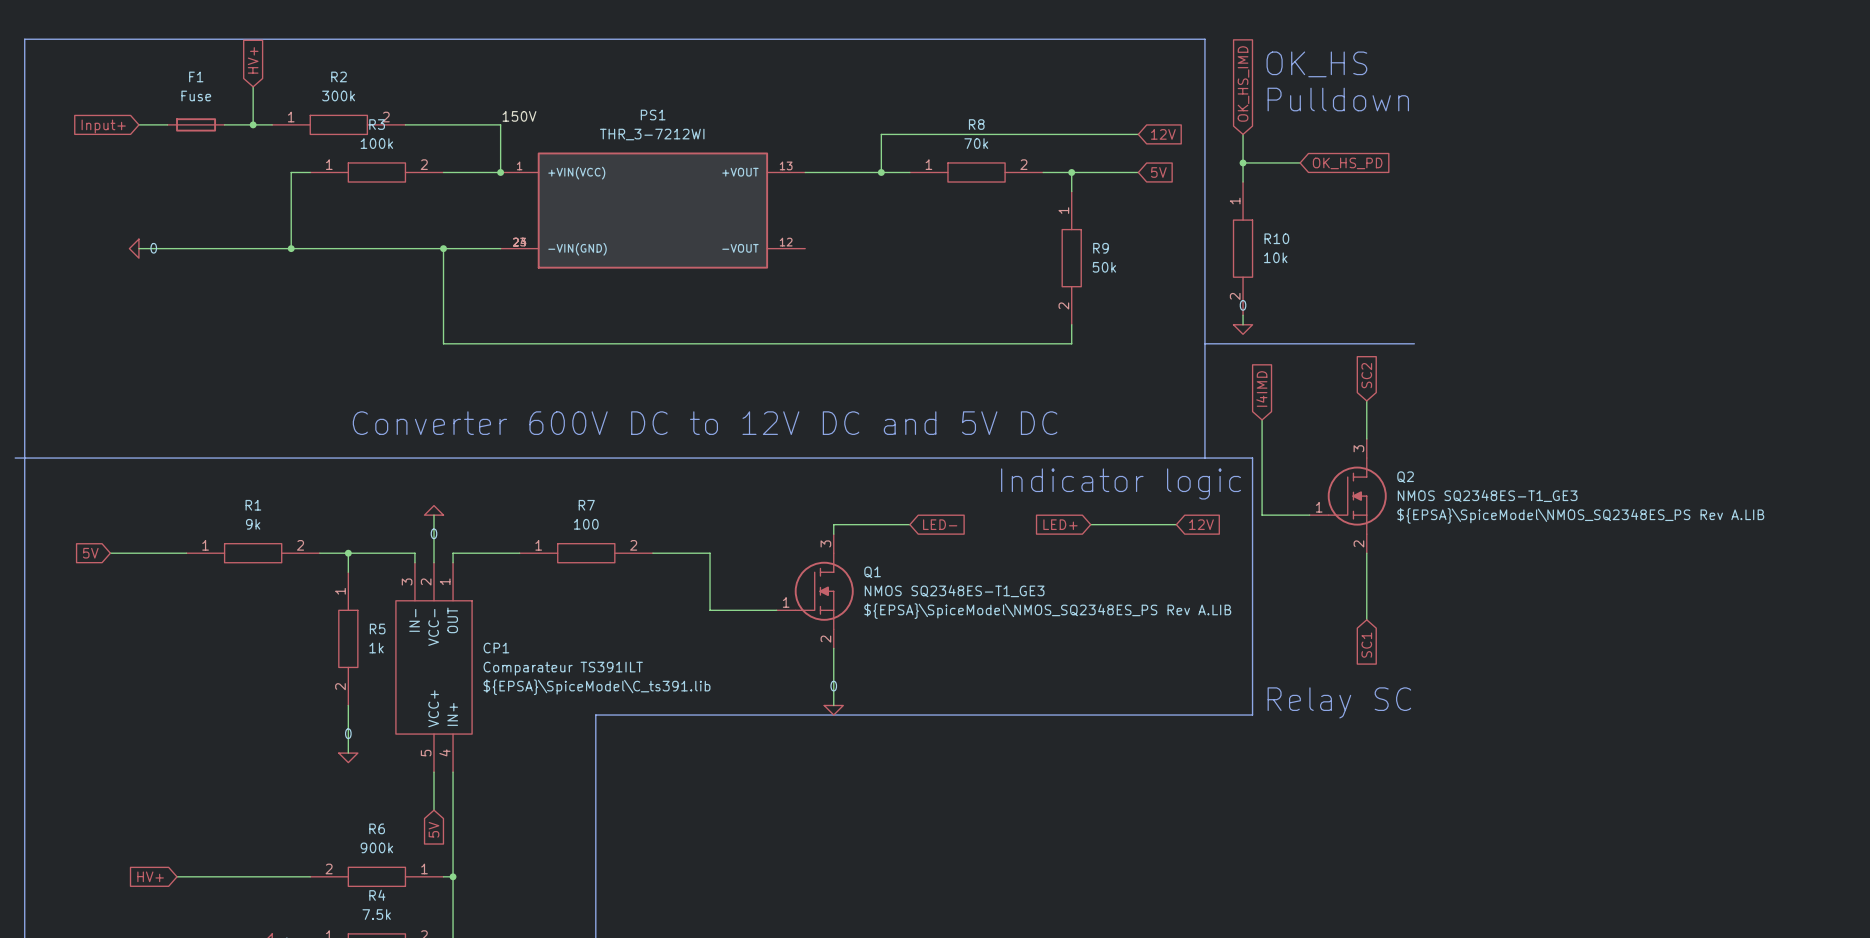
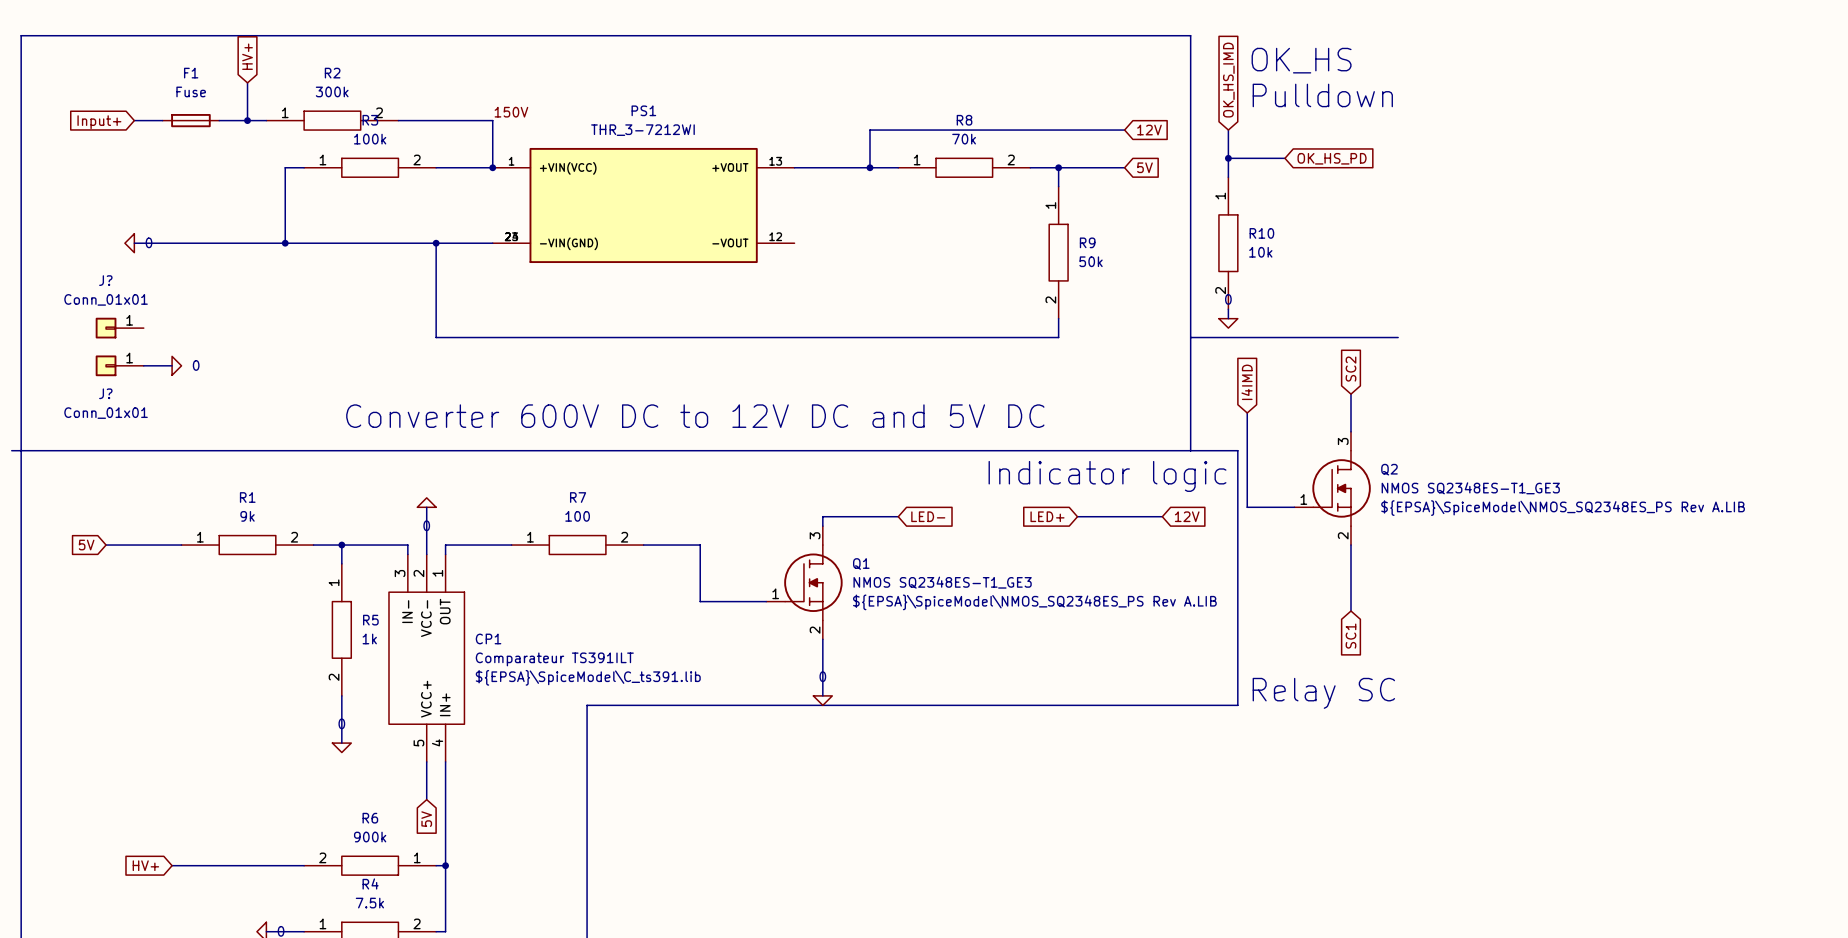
J?: none -> Conn_01x01 (119, 328)
J?: none -> Conn_01x01 (119, 365)
wire: none -> (143, 365) (172, 365)
power symbol: none -> 0 (176, 365)

